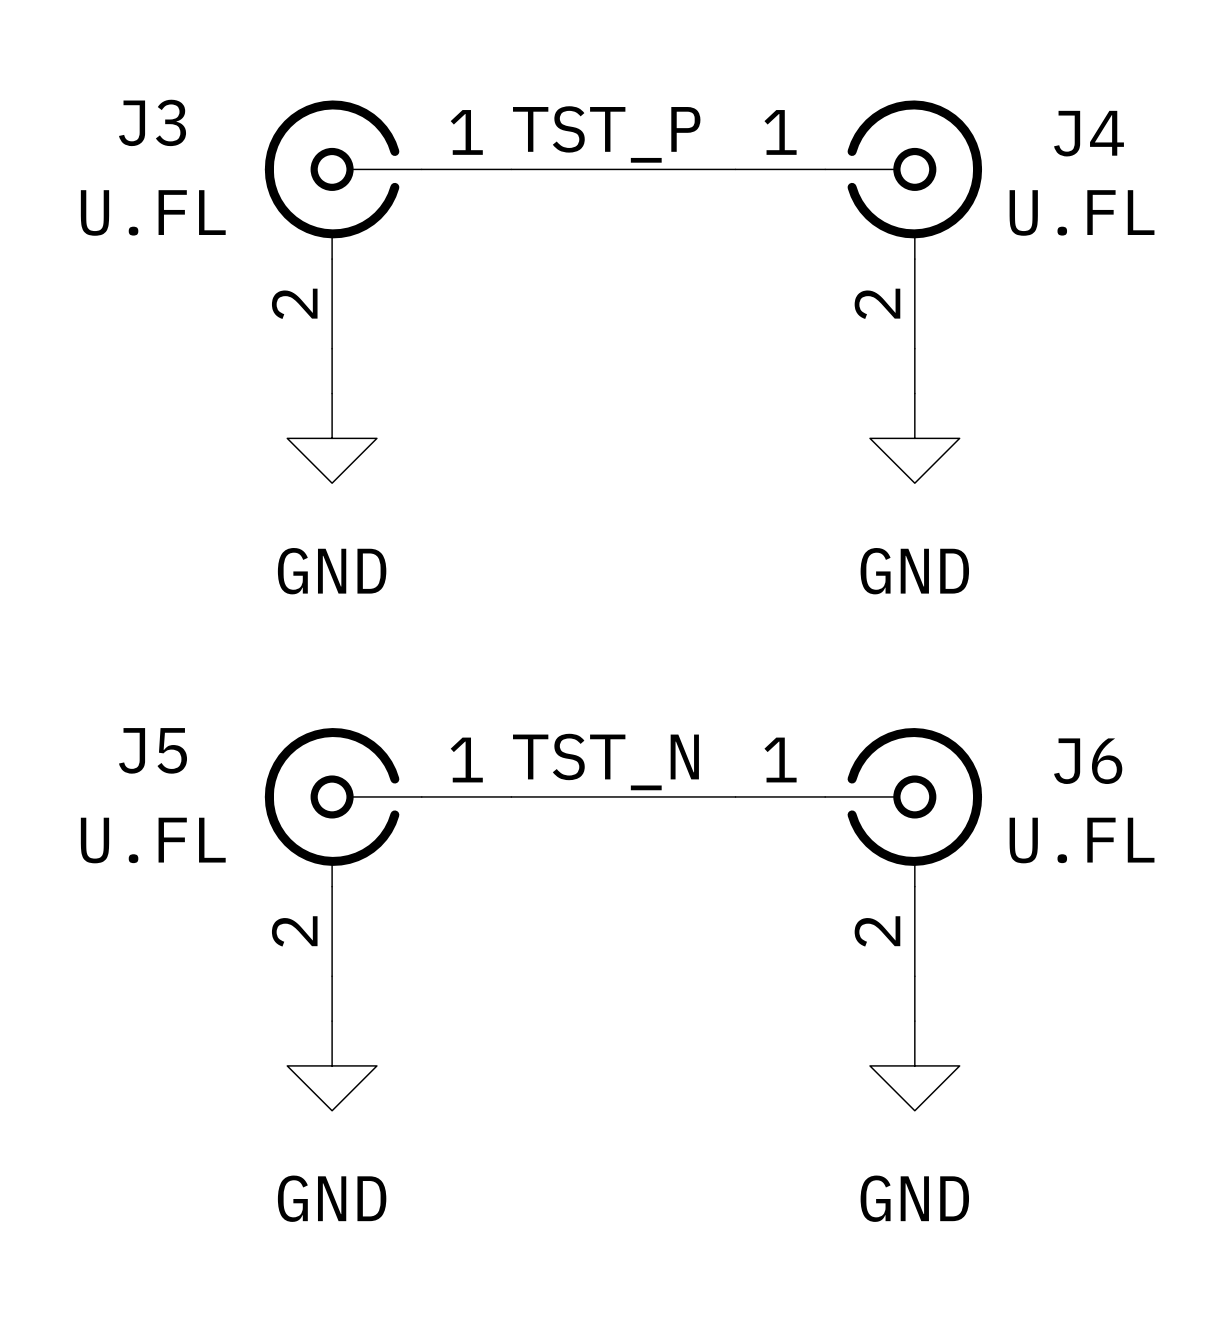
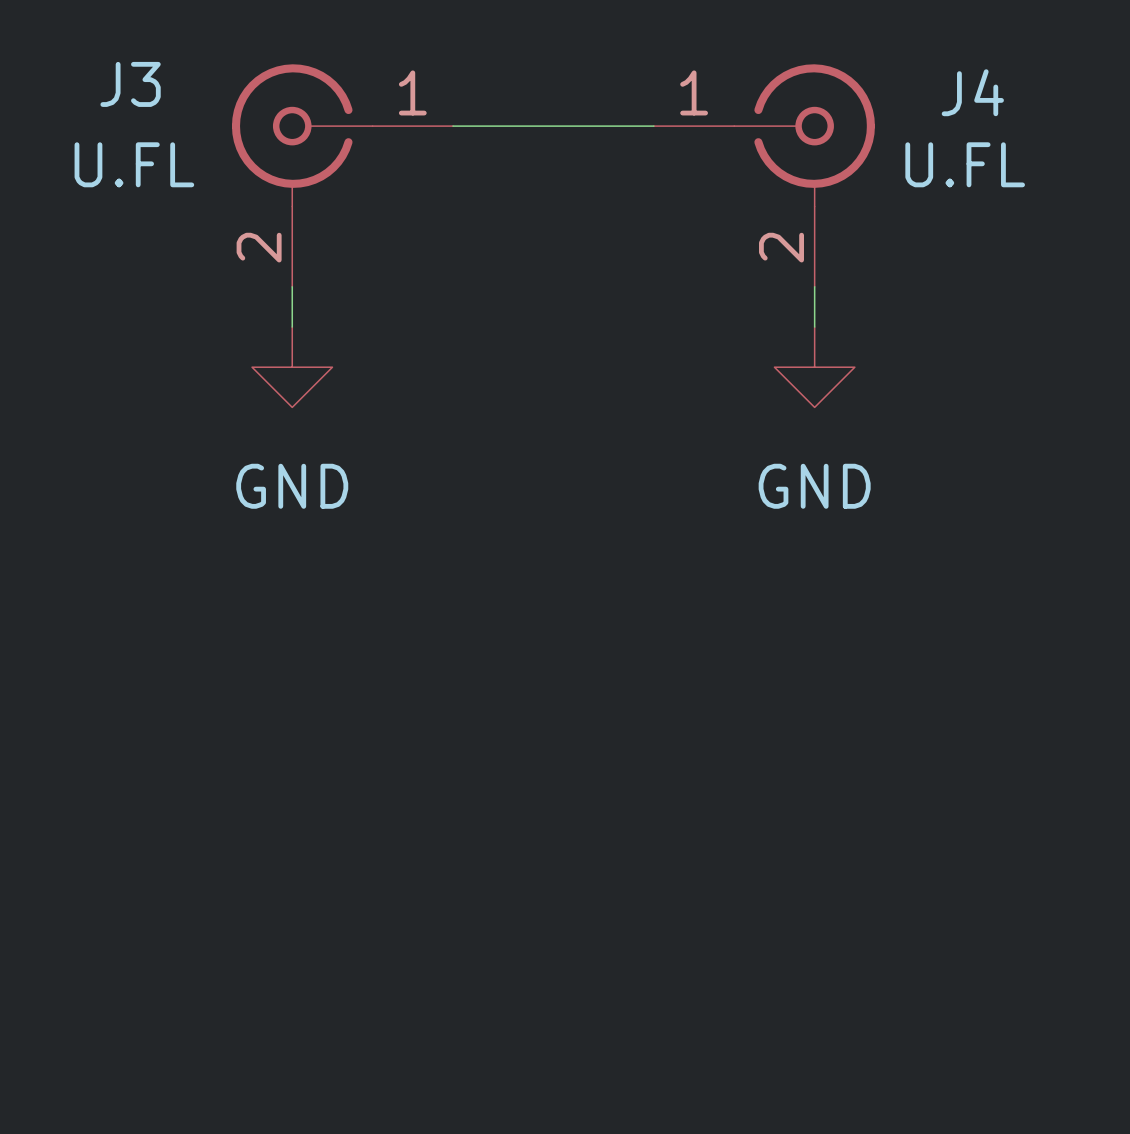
label: TST_P (606, 134) -> none
label: TST_N (605, 762) -> none
wire: (511, 796) (735, 796) -> none
J5: U.FL (388, 852) -> none
J6: U.FL (858, 852) -> none
wire: (332, 976) (332, 1021) -> none
wire: (914, 976) (914, 1021) -> none
power symbol: GND (332, 1065) -> none
power symbol: GND (914, 1065) -> none

